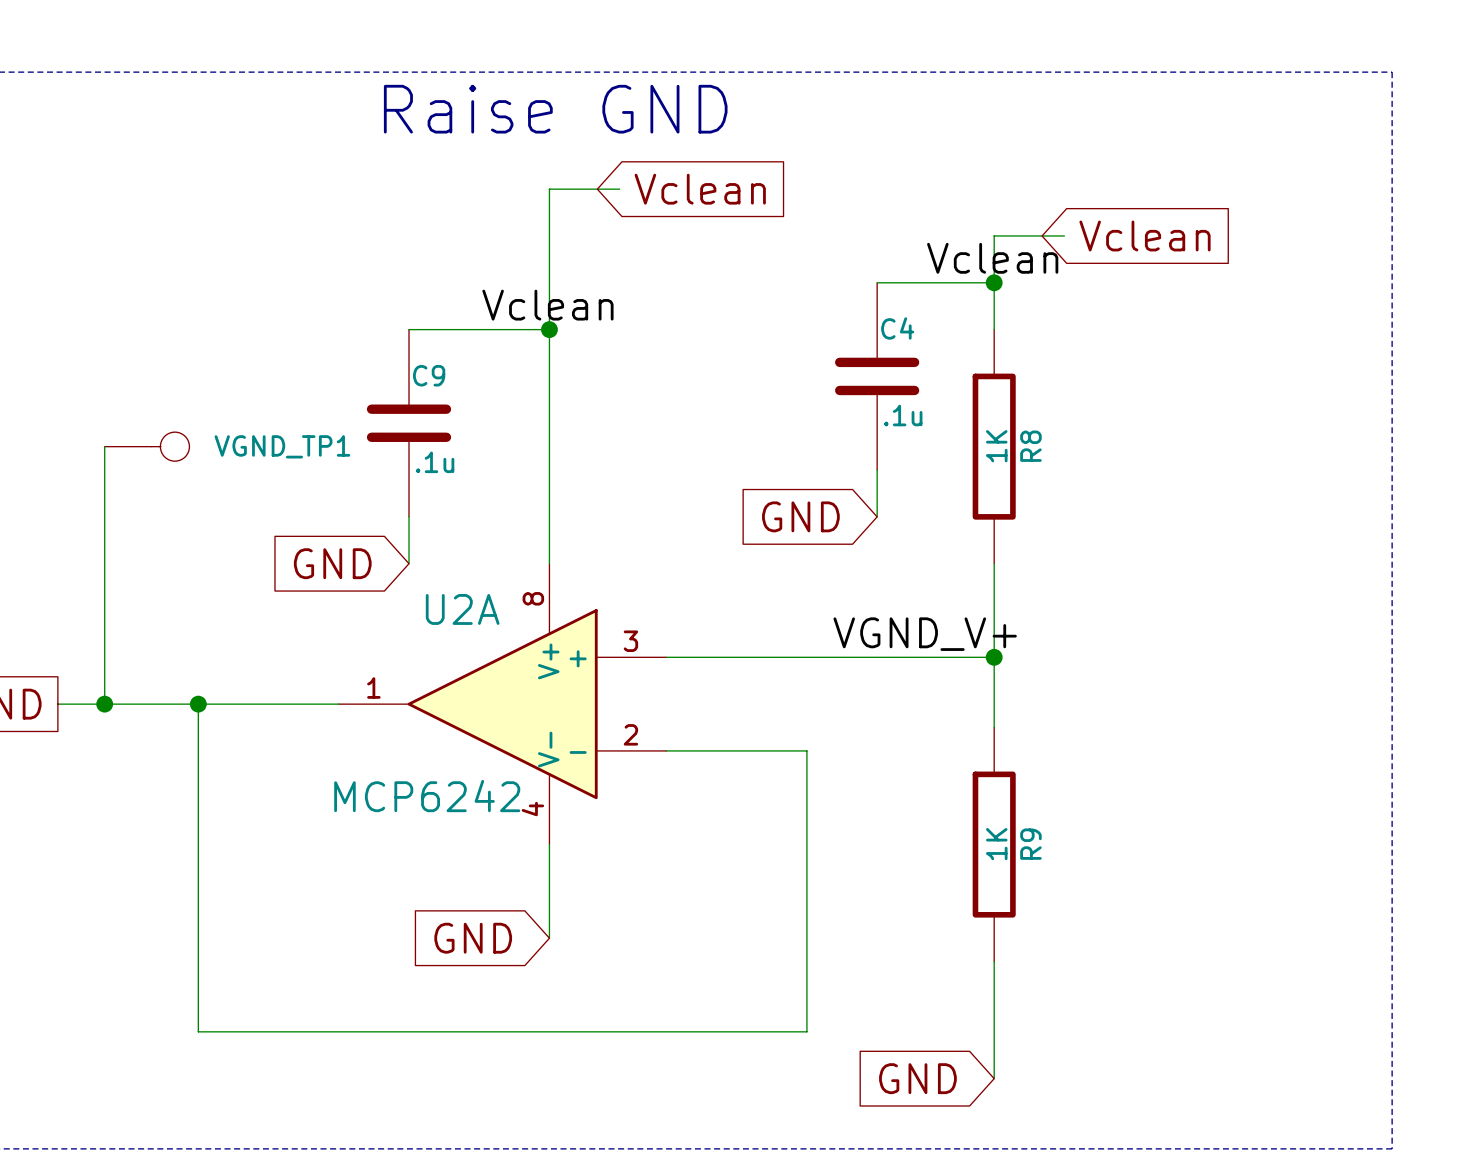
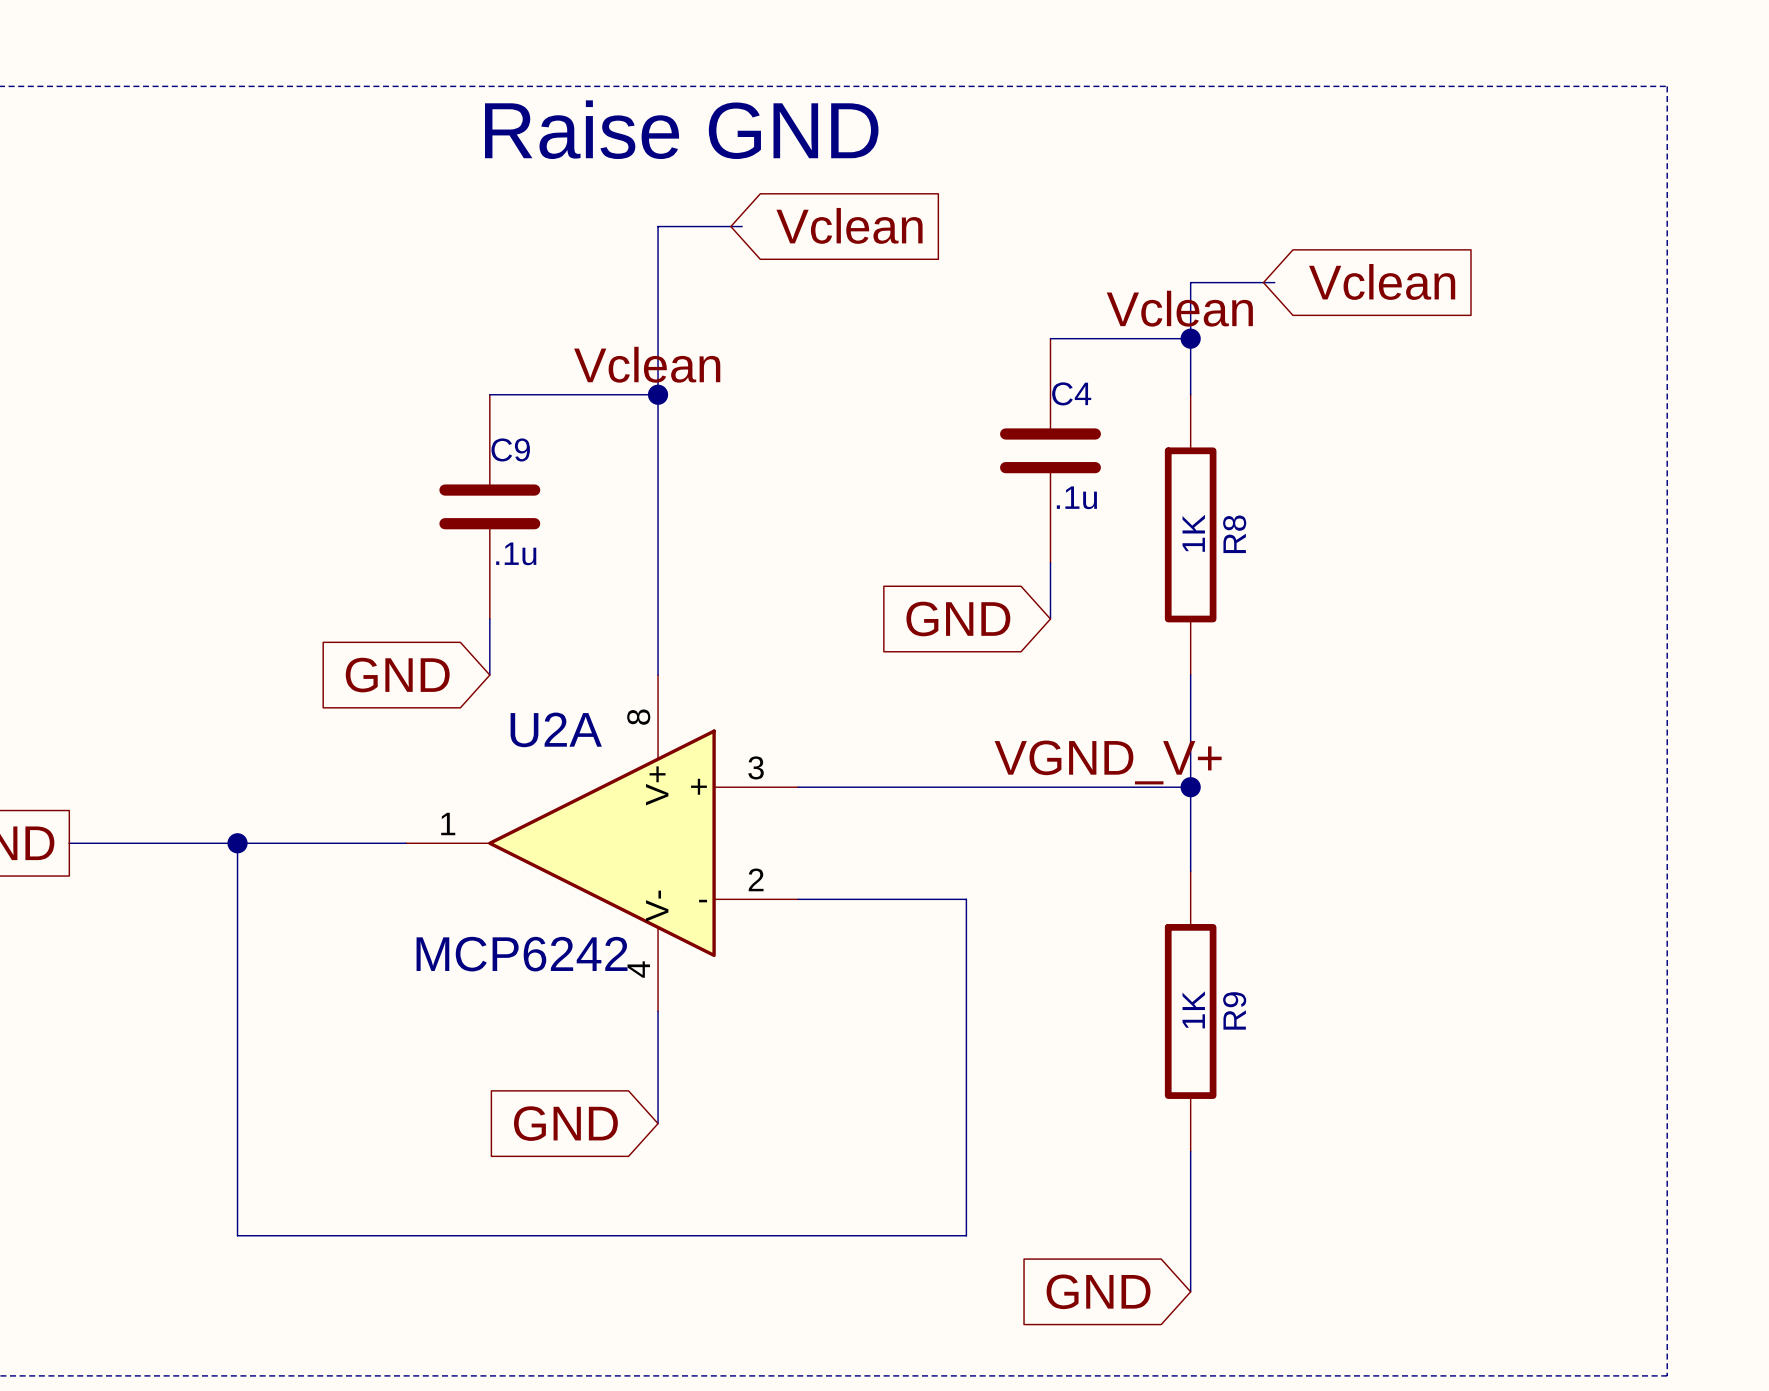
wire: (104, 446) (104, 704) -> none
VGND_TP1: (147, 446) -> none
junction: (104, 704) -> none

